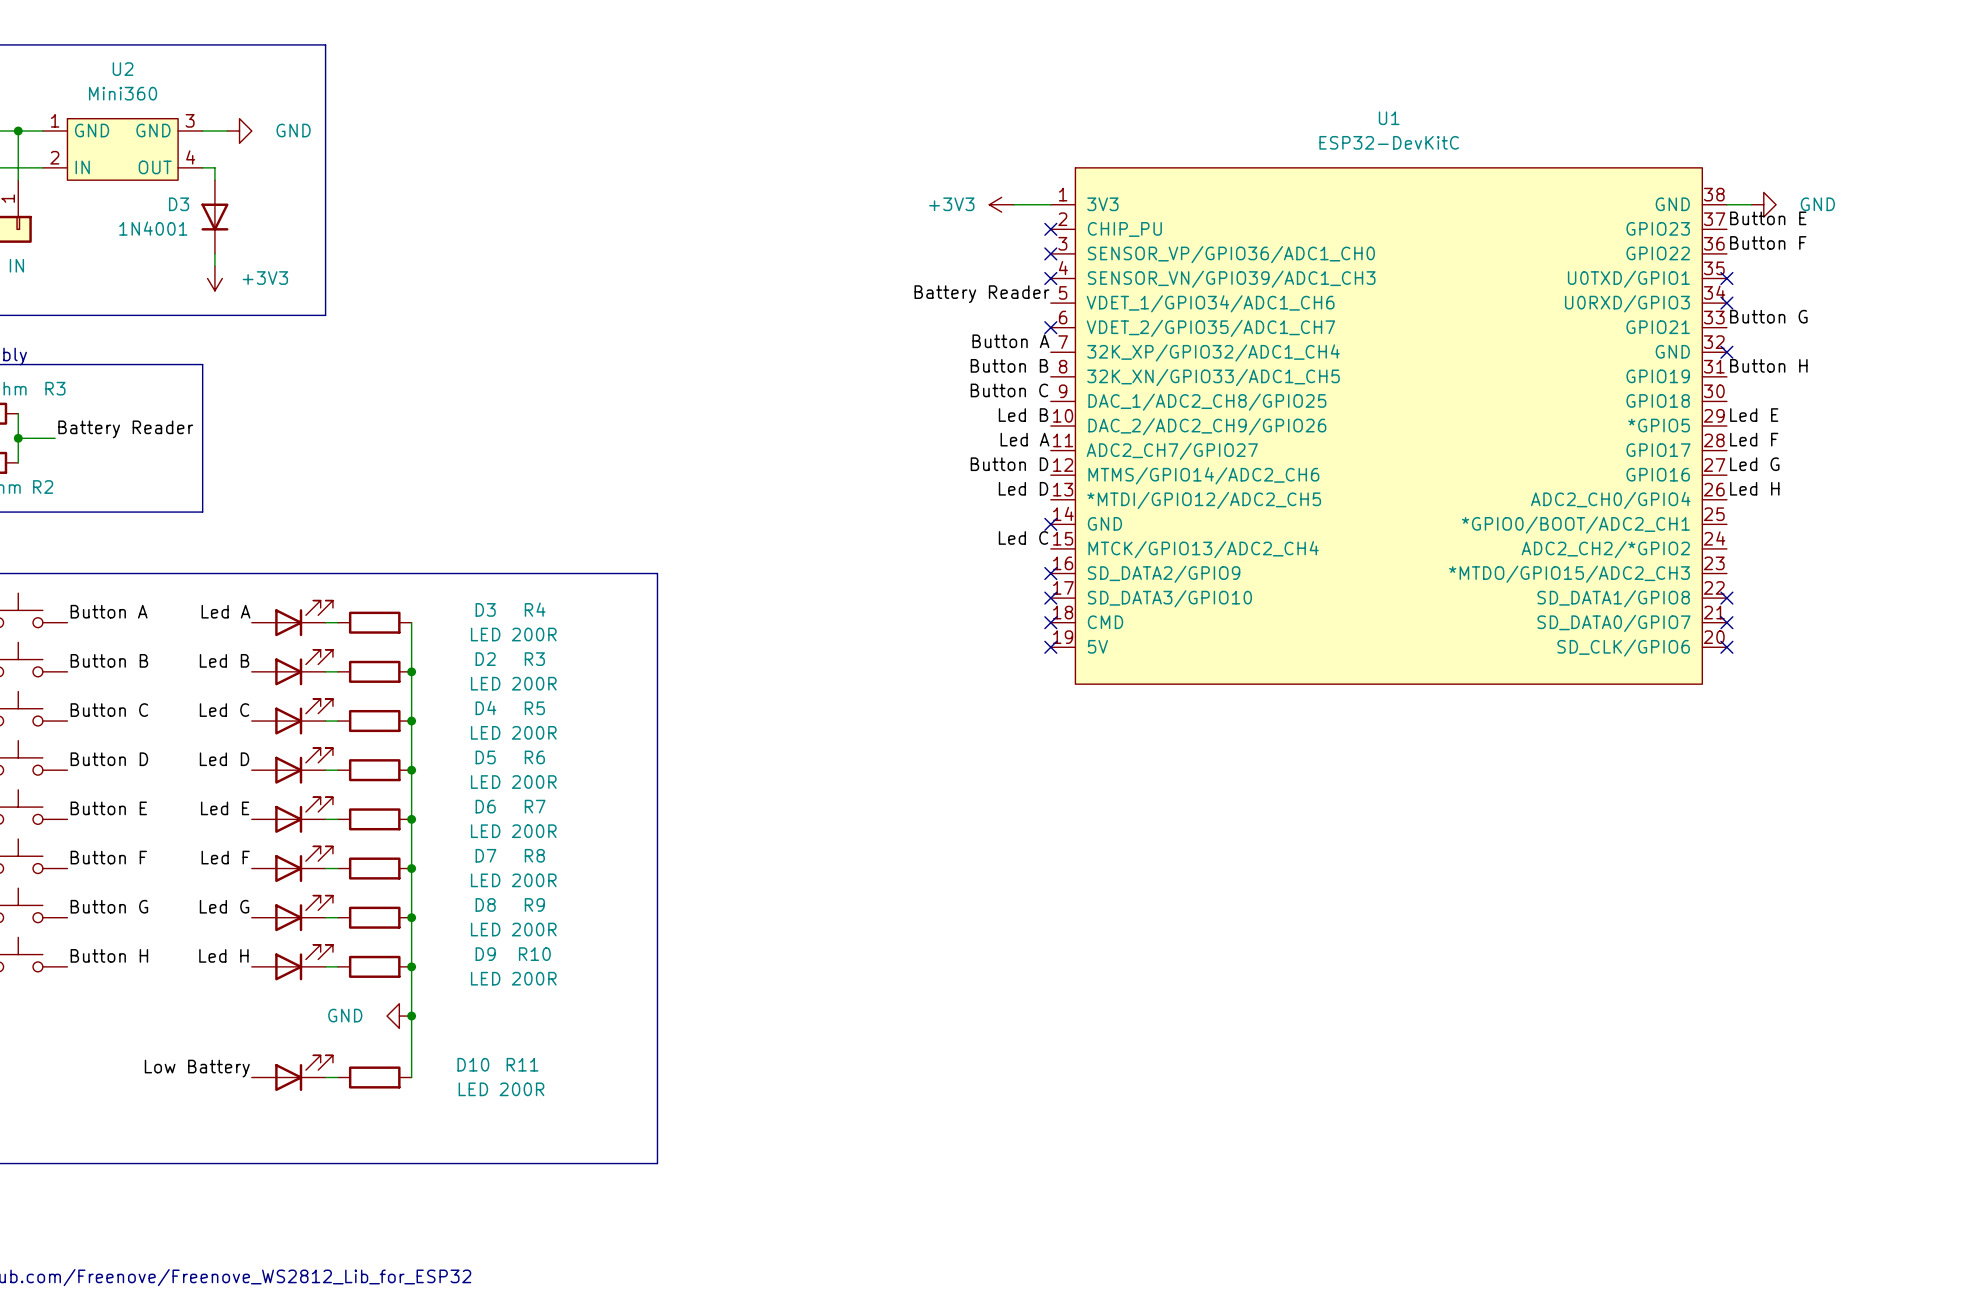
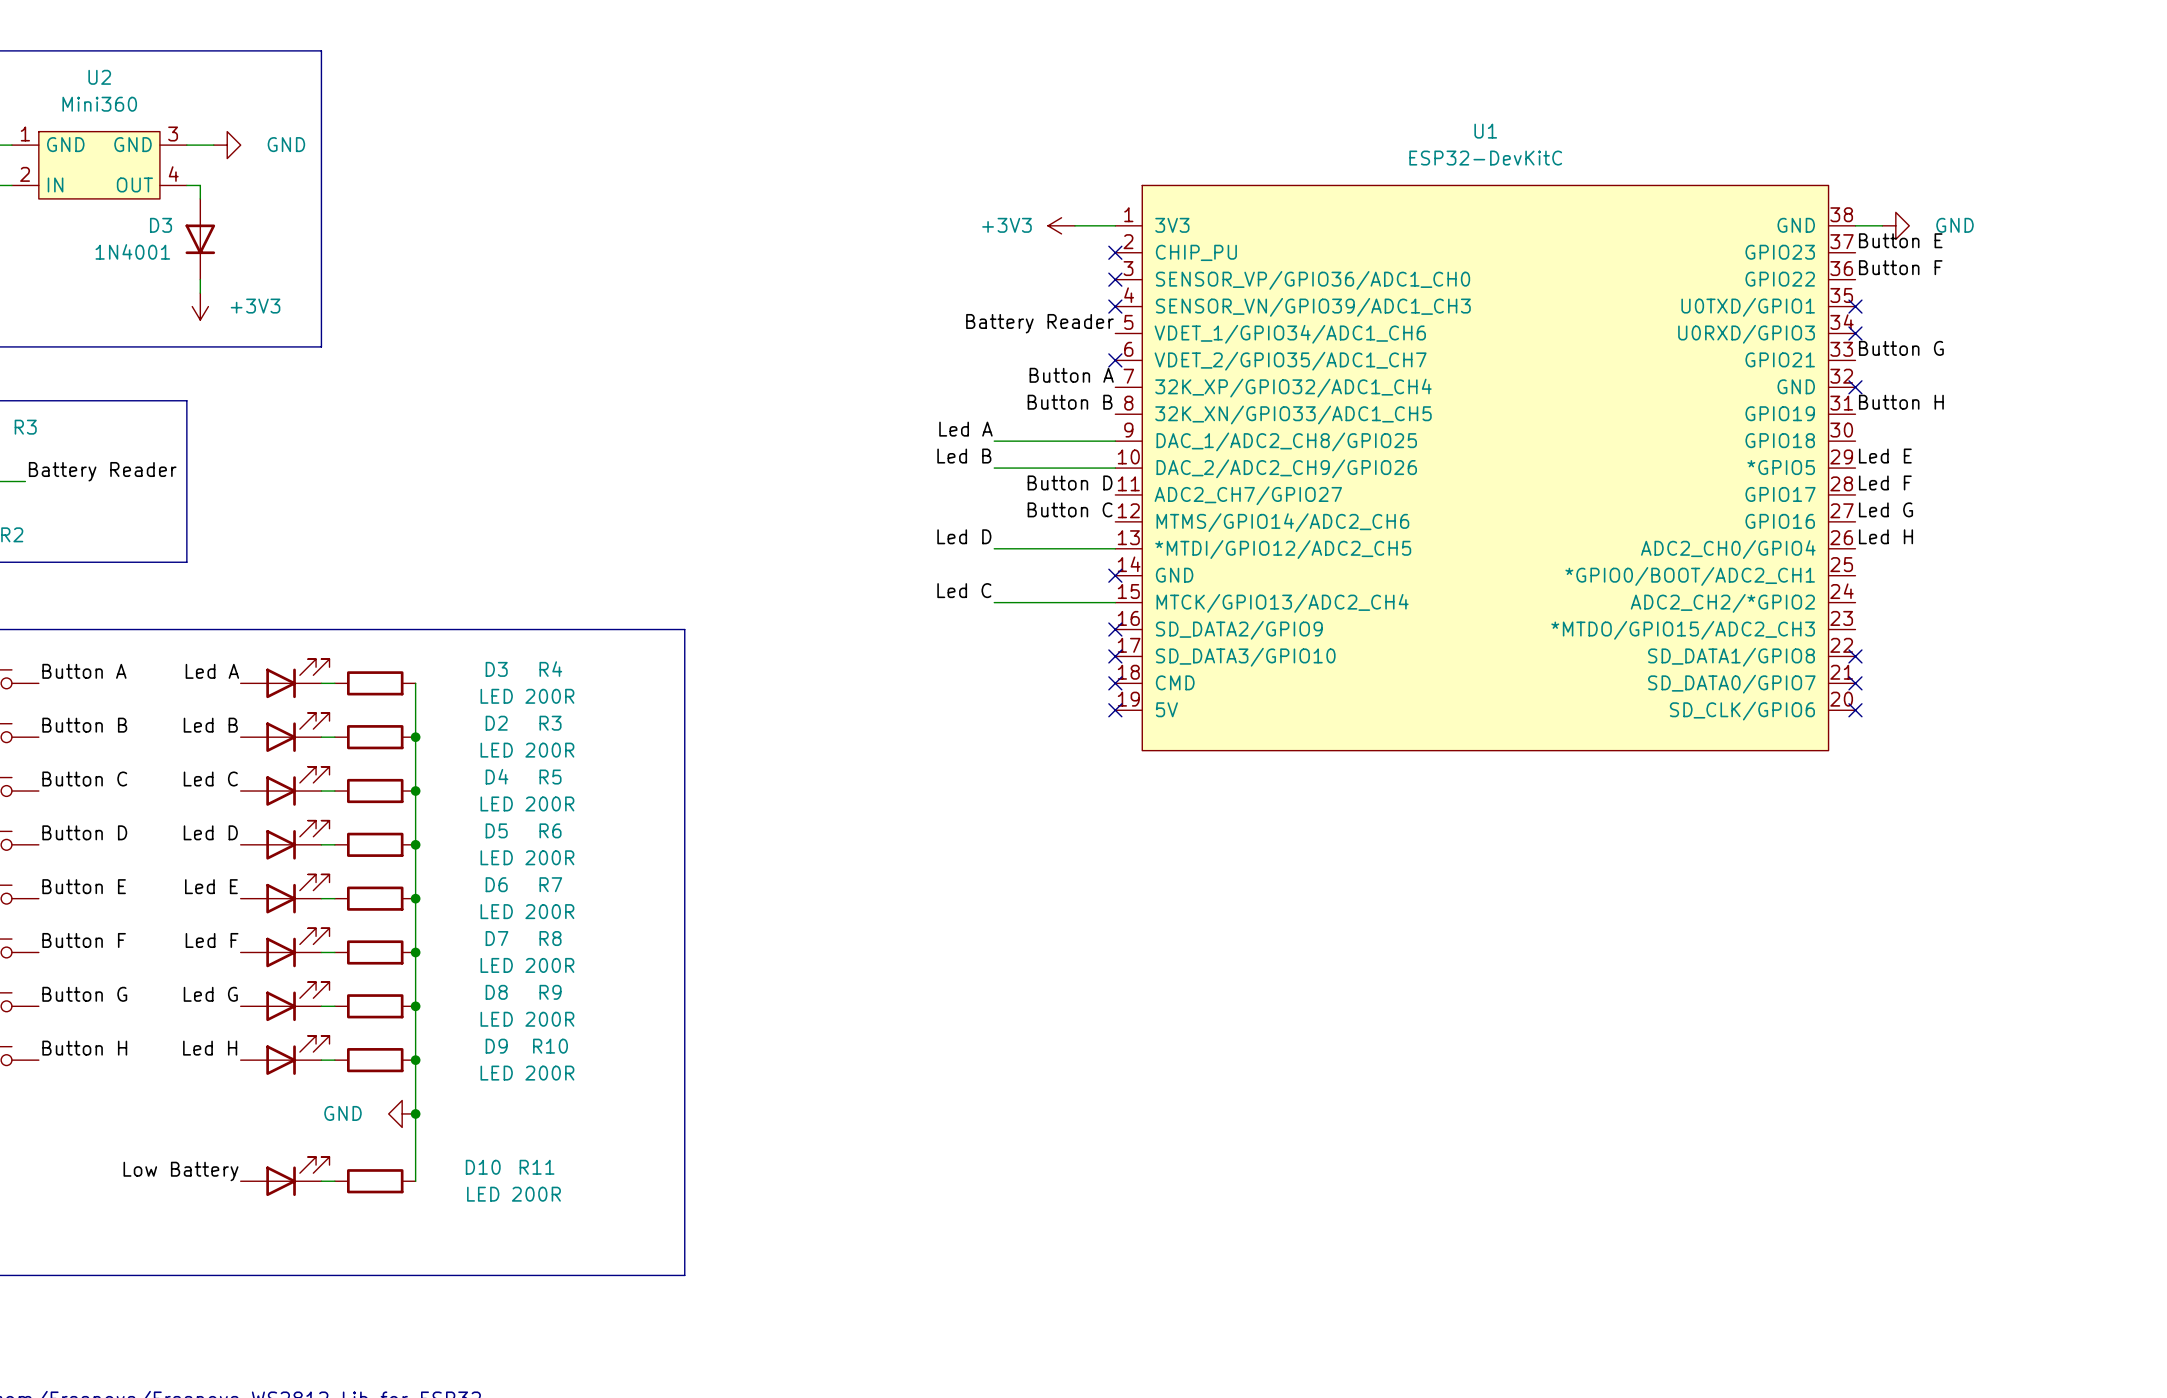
label: none -> Led A (965, 429)
label: Button C (1009, 390) -> none
wire: none -> (994, 441) (1115, 441)
label position: Led B (1023, 415) -> Led B (964, 456)
wire: none -> (994, 468) (1115, 468)
label: Led A (1024, 439) -> Button D (1070, 482)
label: Button D (1009, 464) -> Button C (1070, 509)
label position: Led D (1023, 488) -> Led D (964, 536)
wire: none -> (994, 548) (1115, 548)
label position: Led C (1023, 537) -> Led C (964, 590)
wire: none -> (994, 602) (1115, 602)

